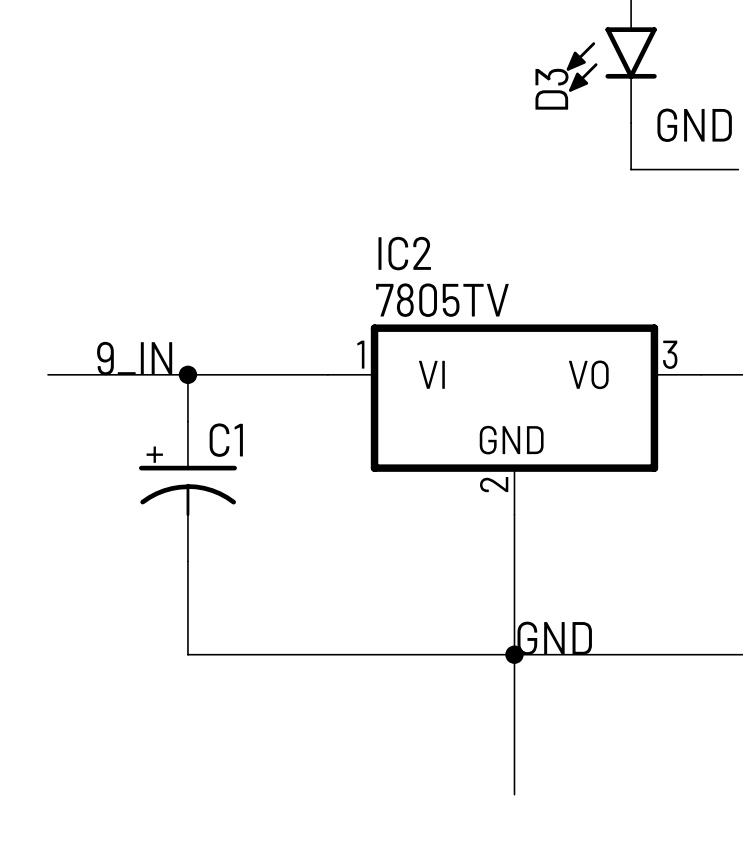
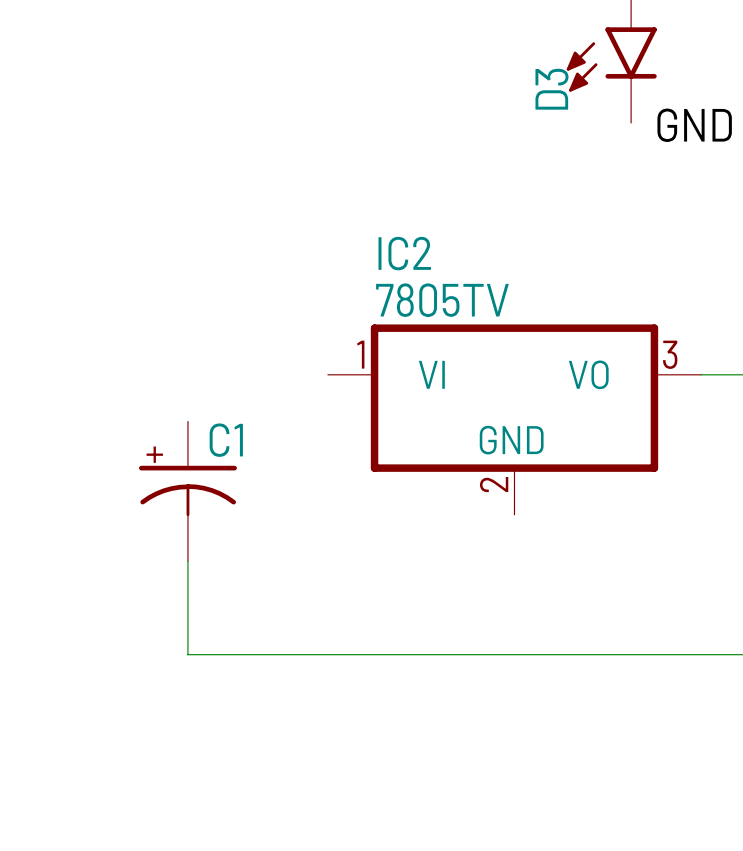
wire: (631, 122) (631, 169) (738, 169) -> none
label: 9_IN (134, 358) -> none
wire: (48, 374) (327, 374) -> none
wire: (187, 374) (187, 421) -> none
junction: (187, 374) -> none
wire: (514, 514) (514, 794) -> none
label: GND (554, 638) -> none
junction: (514, 654) -> none

